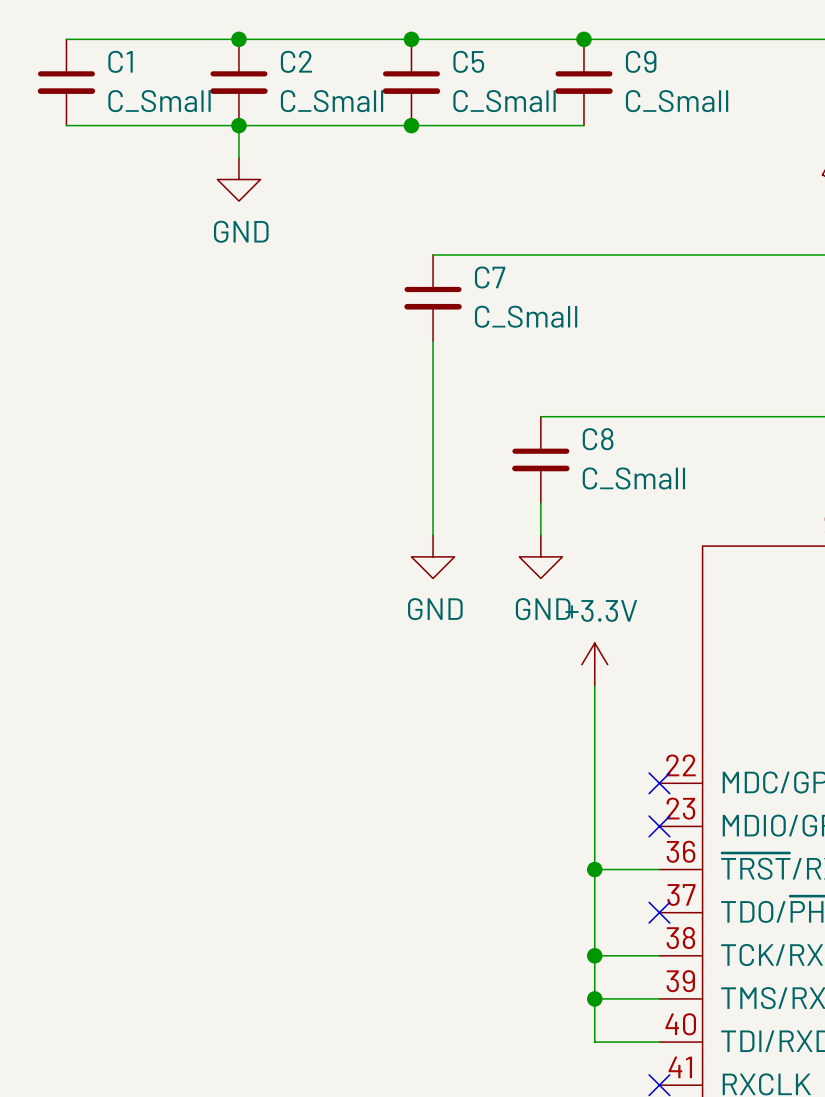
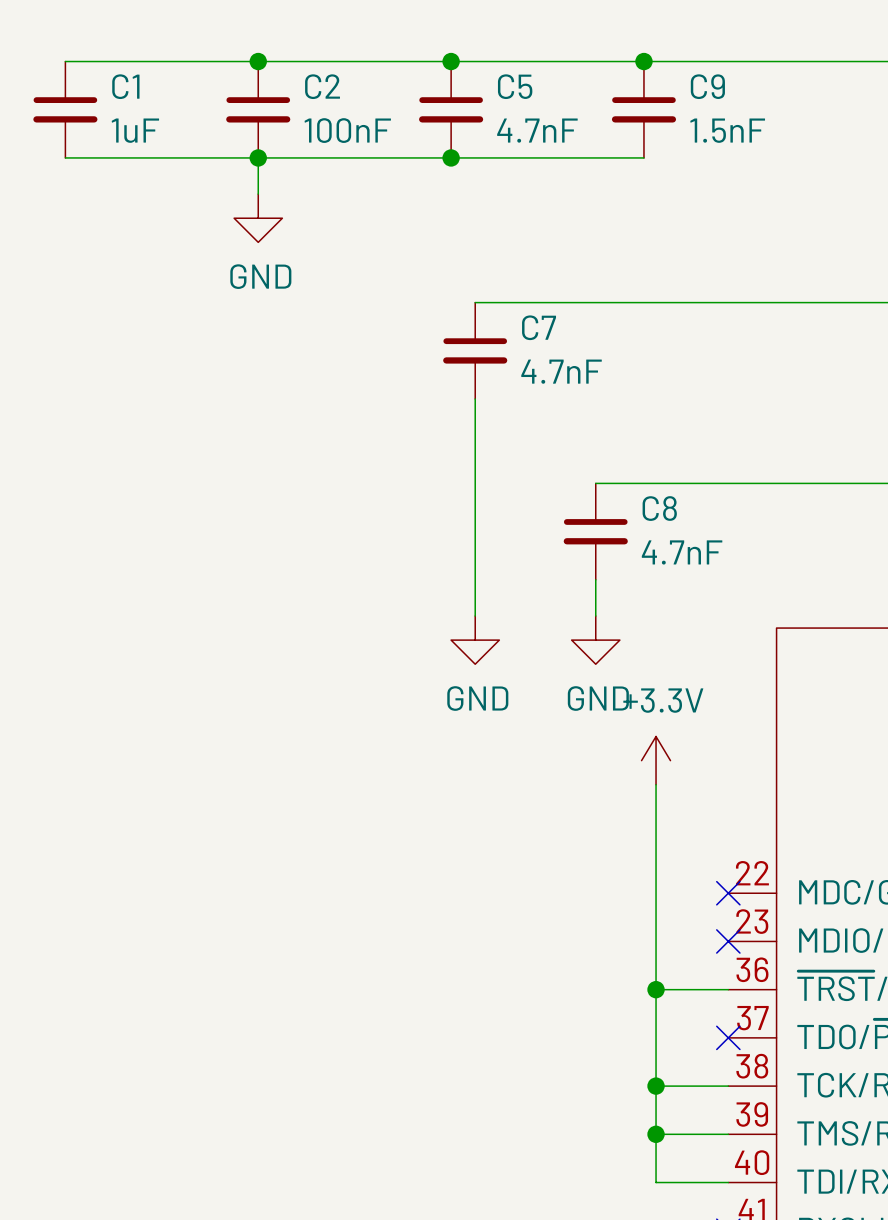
C1 value: C_Small (159, 101) -> 1uF (135, 130)
C2 value: C_Small (332, 101) -> 100nF (347, 130)
C5 value: C_Small (504, 101) -> 4.7nF (537, 130)
C9 value: C_Small (677, 101) -> 1.5nF (727, 130)
C7 value: C_Small (526, 316) -> 4.7nF (561, 371)
C8 value: C_Small (633, 478) -> 4.7nF (682, 552)

